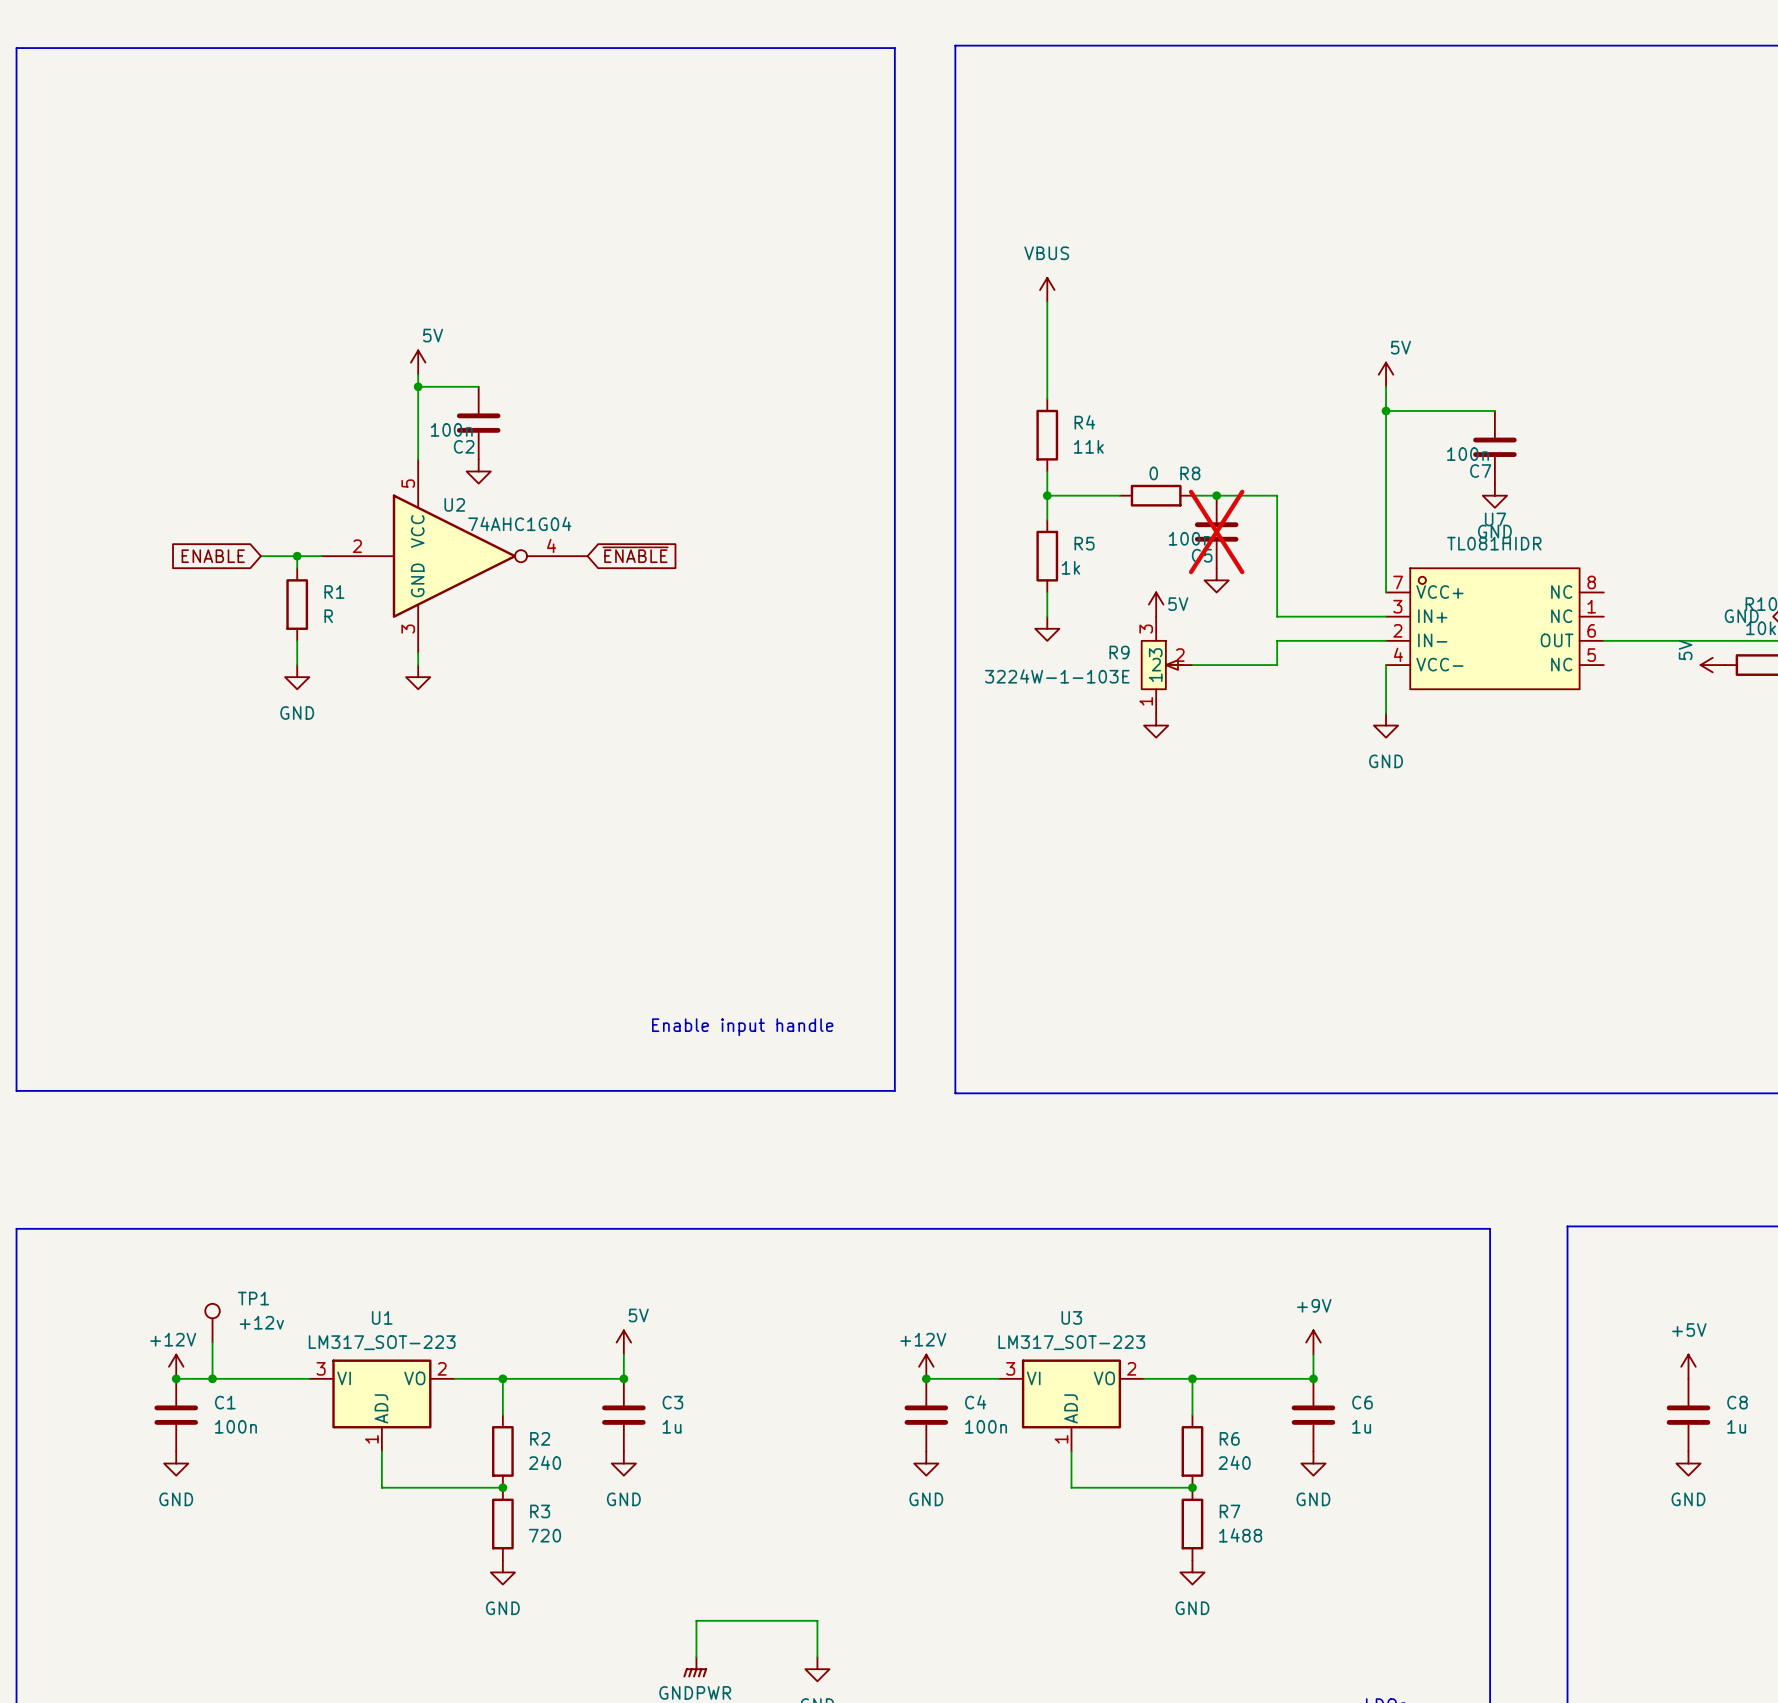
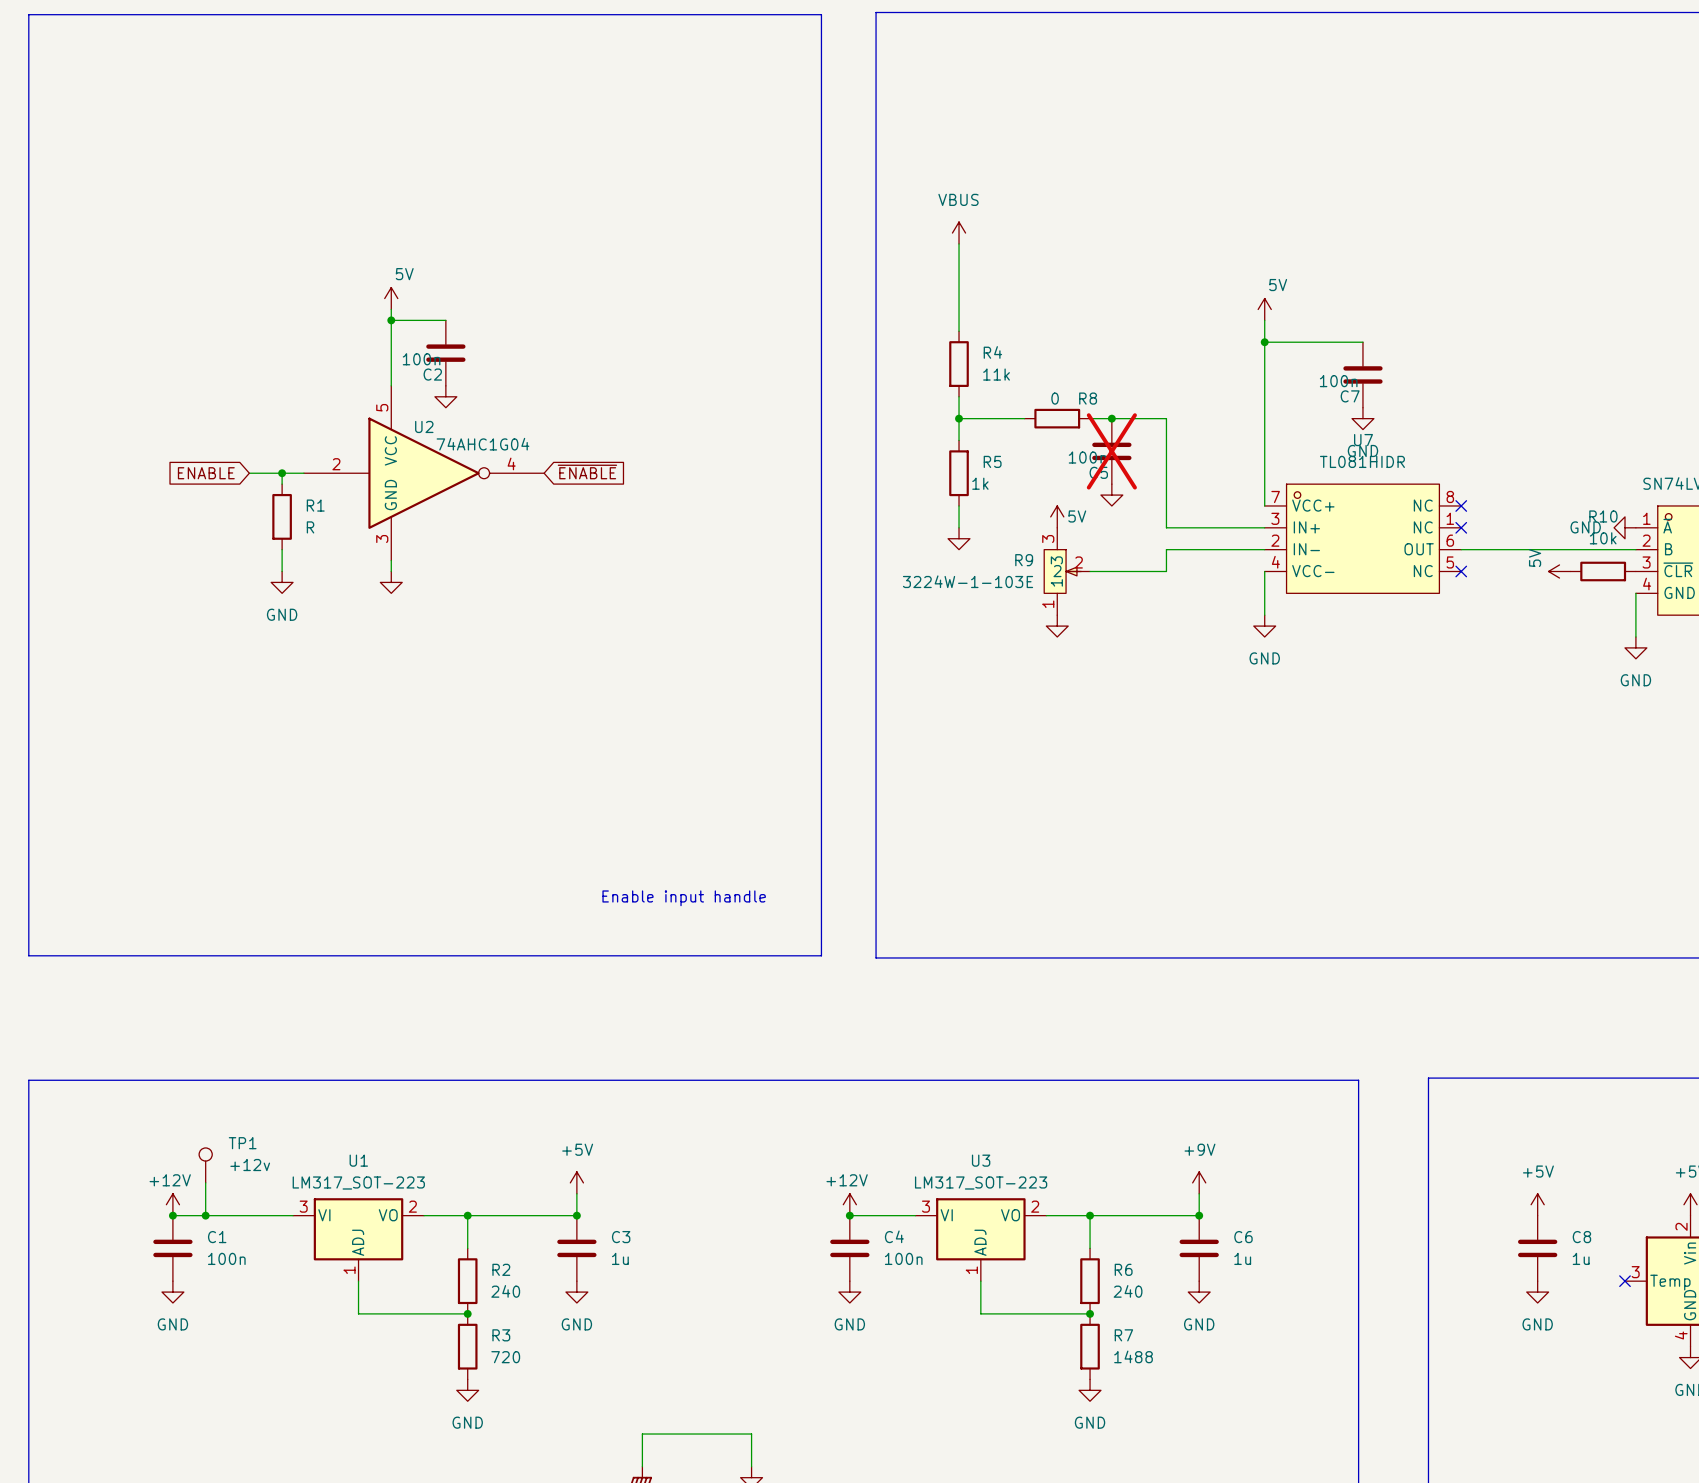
no-connect mark: none -> (1461, 505)
no-connect mark: none -> (1461, 527)
no-connect mark: none -> (1461, 571)
power symbol: 5V (623, 1342) -> +5V (576, 1182)

